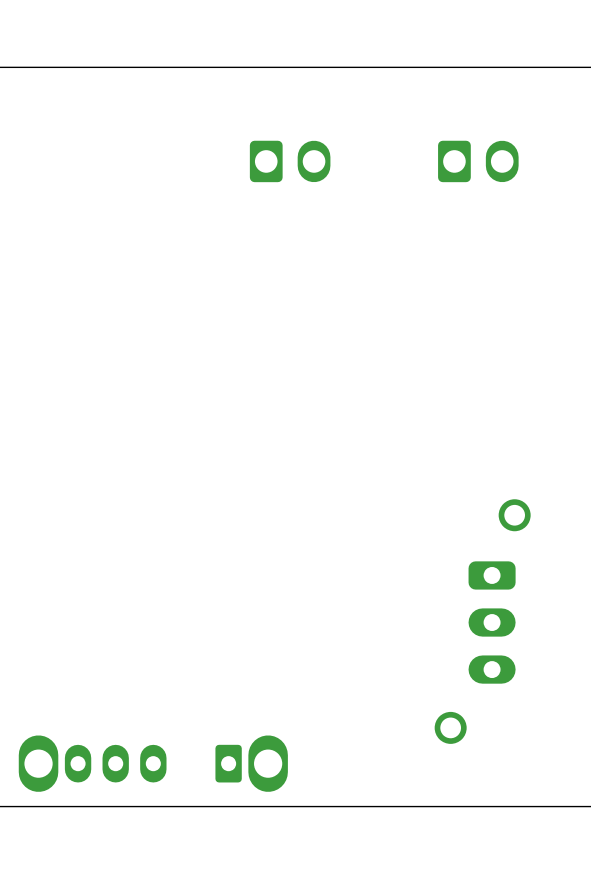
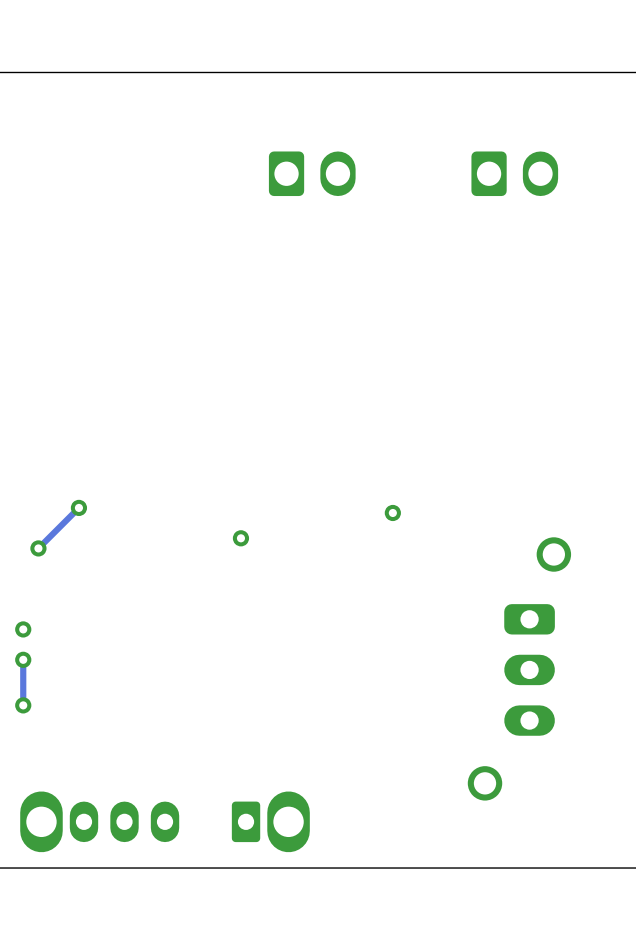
track: none -> (78, 507) (38, 548)
via: none -> (78, 507)
via: none -> (392, 512)
via: none -> (240, 538)
via: none -> (38, 548)
via: none -> (23, 629)
track: none -> (23, 659) (23, 705)
via: none -> (23, 659)
via: none -> (23, 705)

